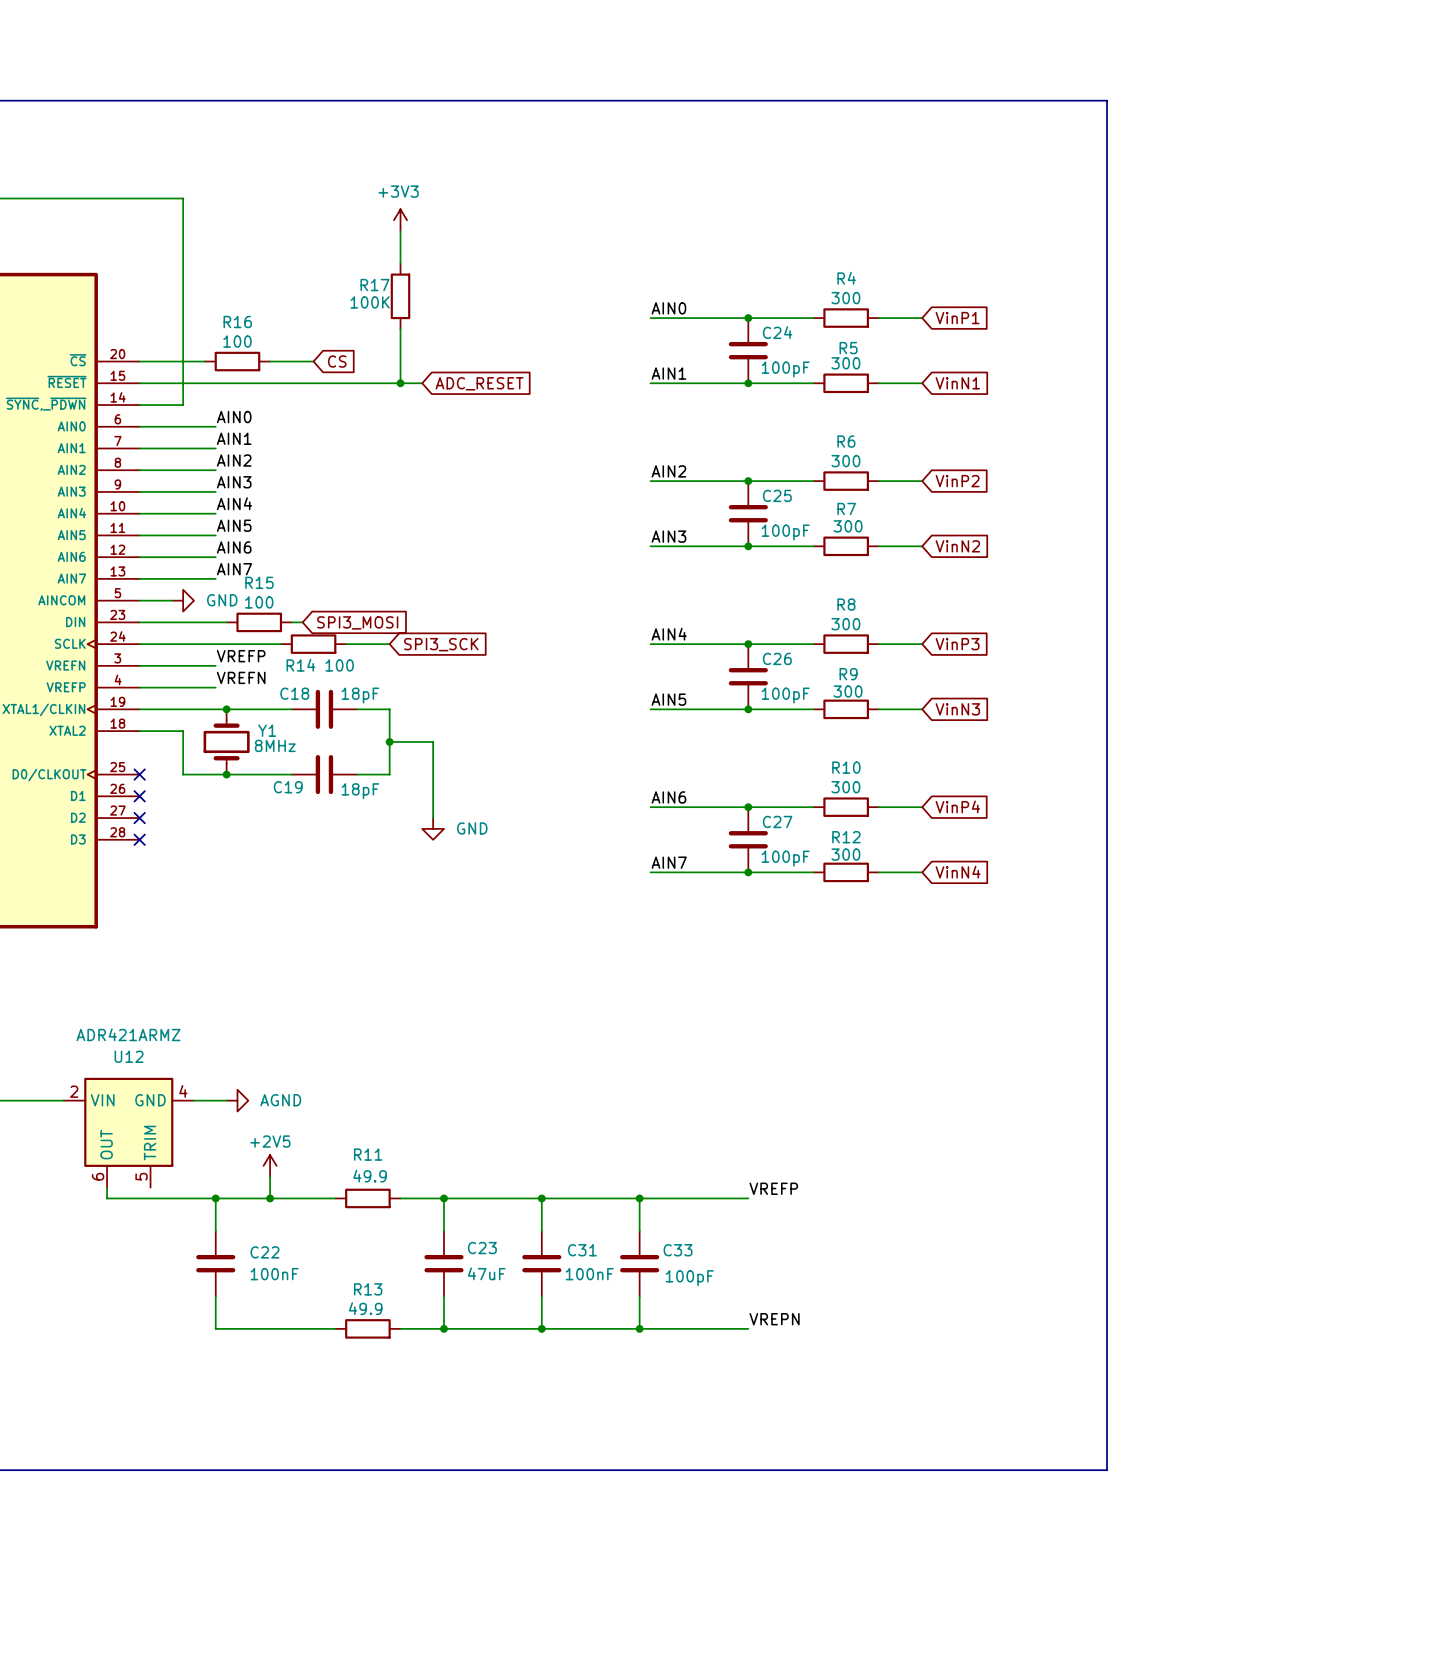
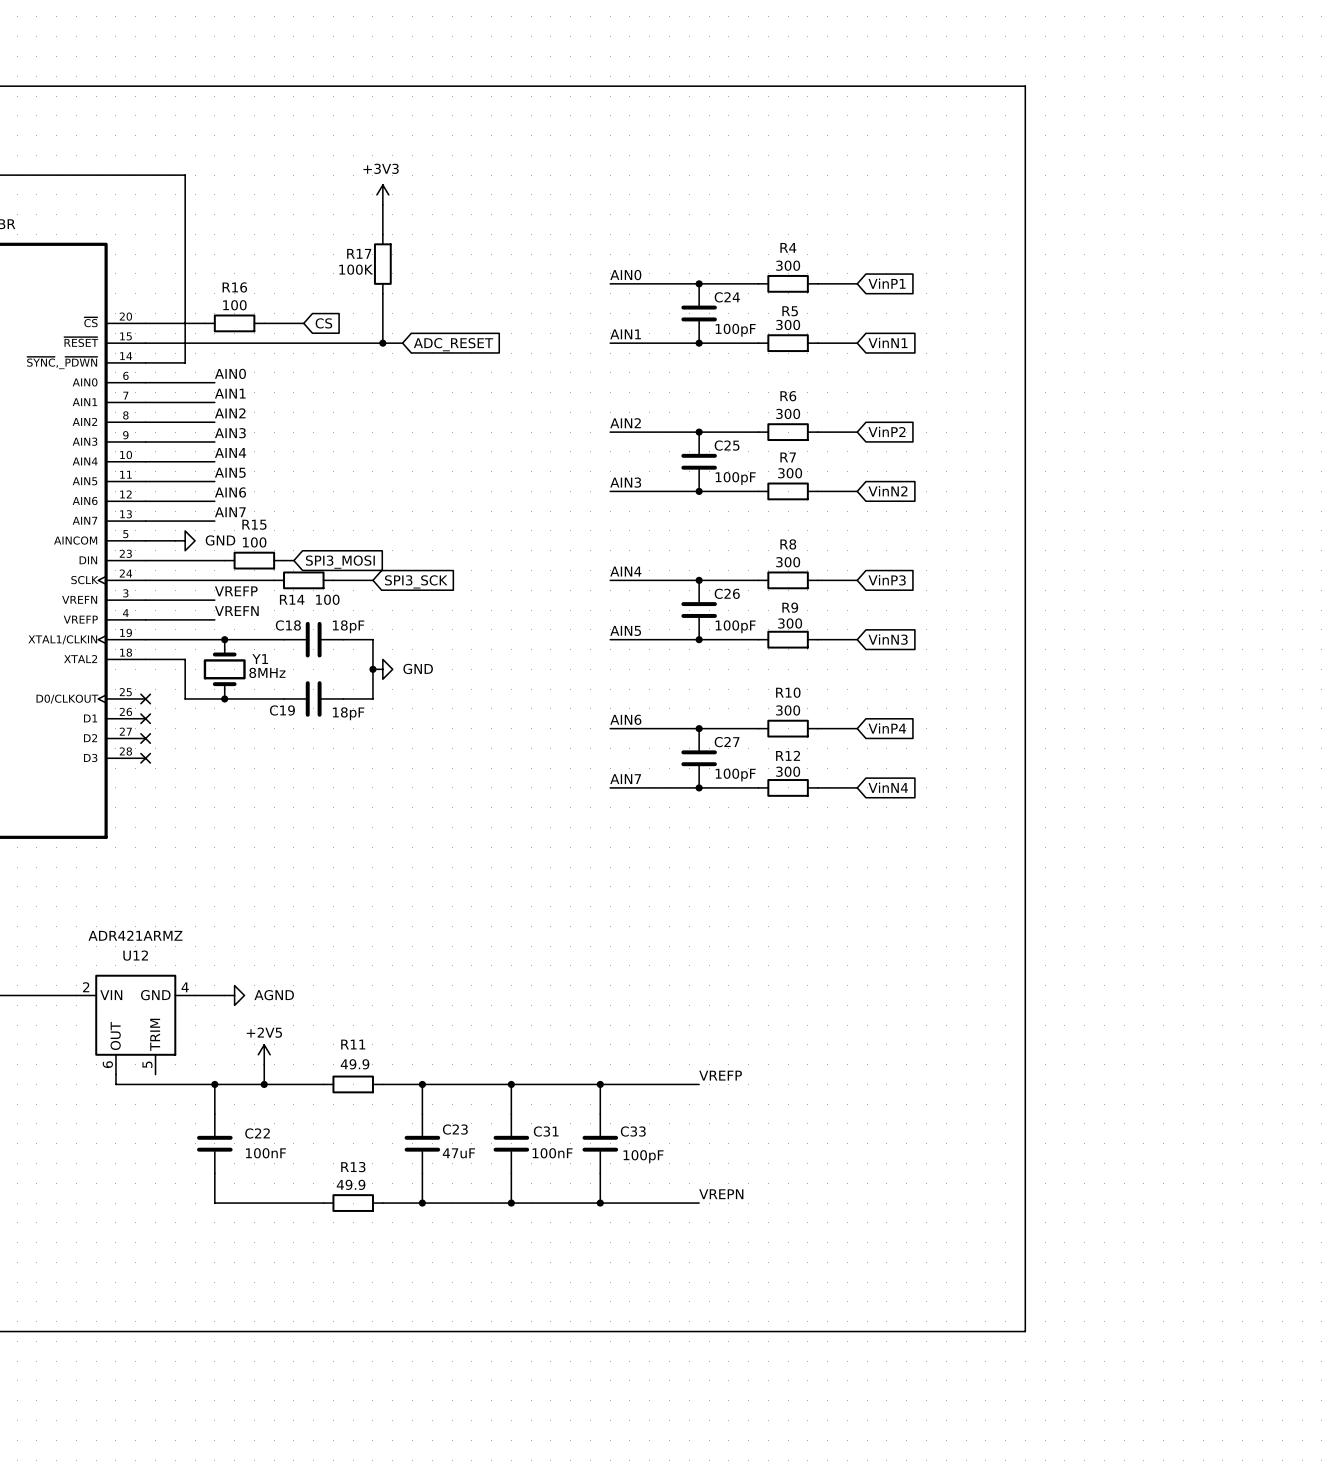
wire: (389, 741) (433, 741) (433, 818) -> none
power symbol rotation: 0° (433, 828) -> 90° counterclockwise (382, 669)
power symbol position: GND (433, 828) -> GND (382, 669)

